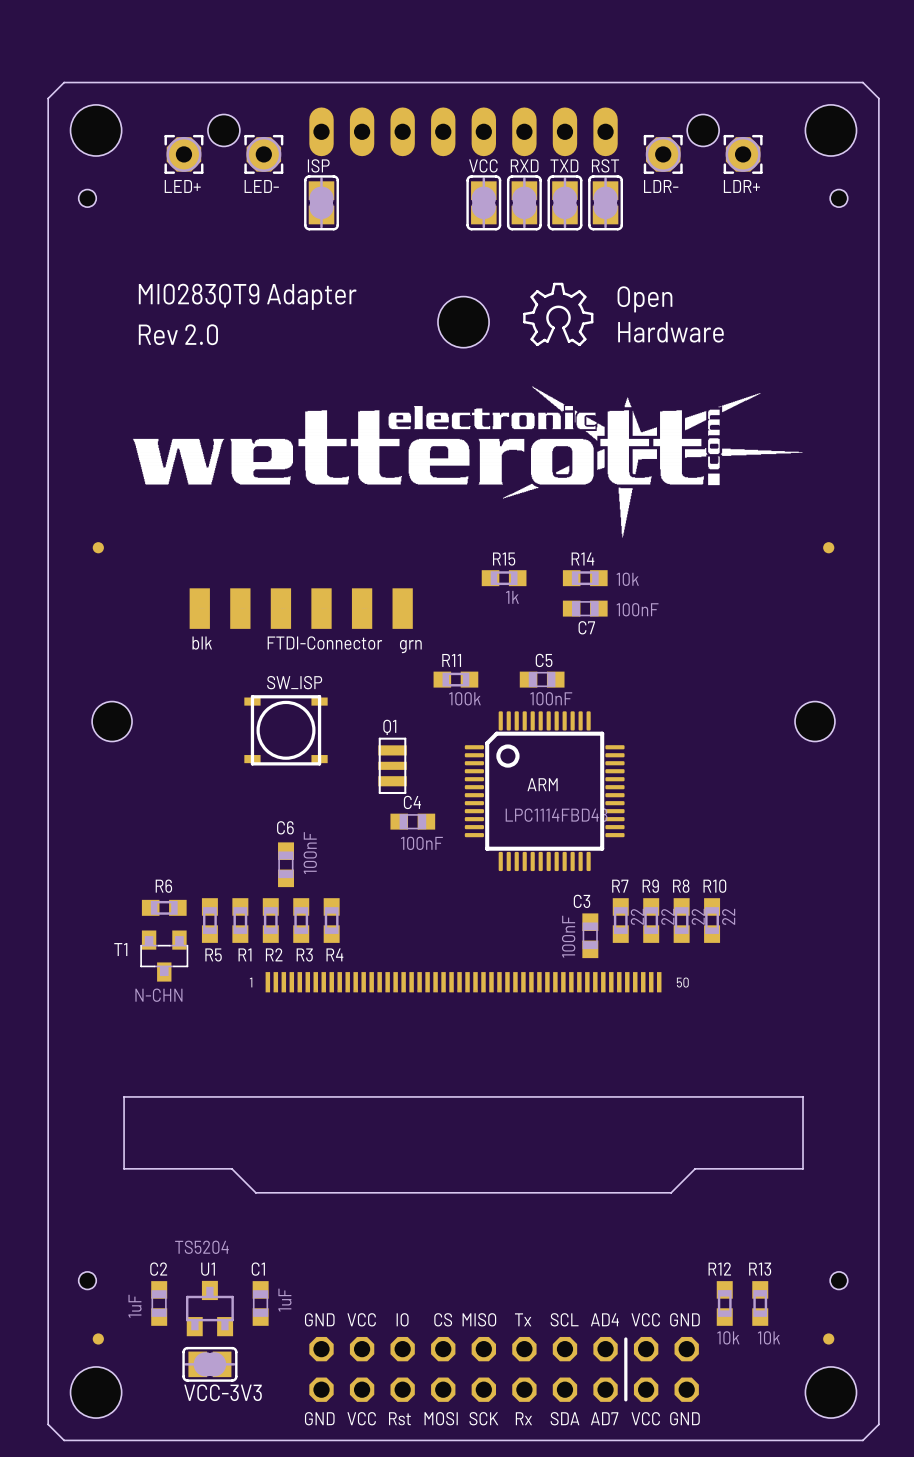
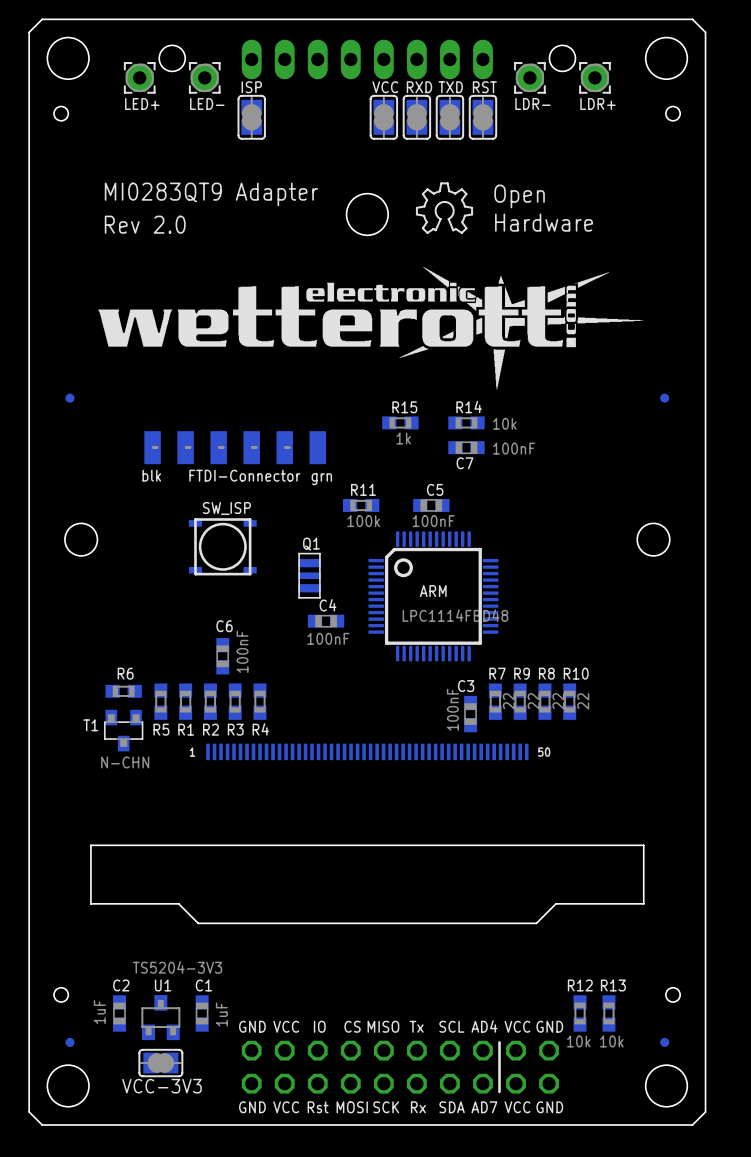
U1 value: TS5204 (201, 1247) -> TS5204-3V3 (177, 967)

